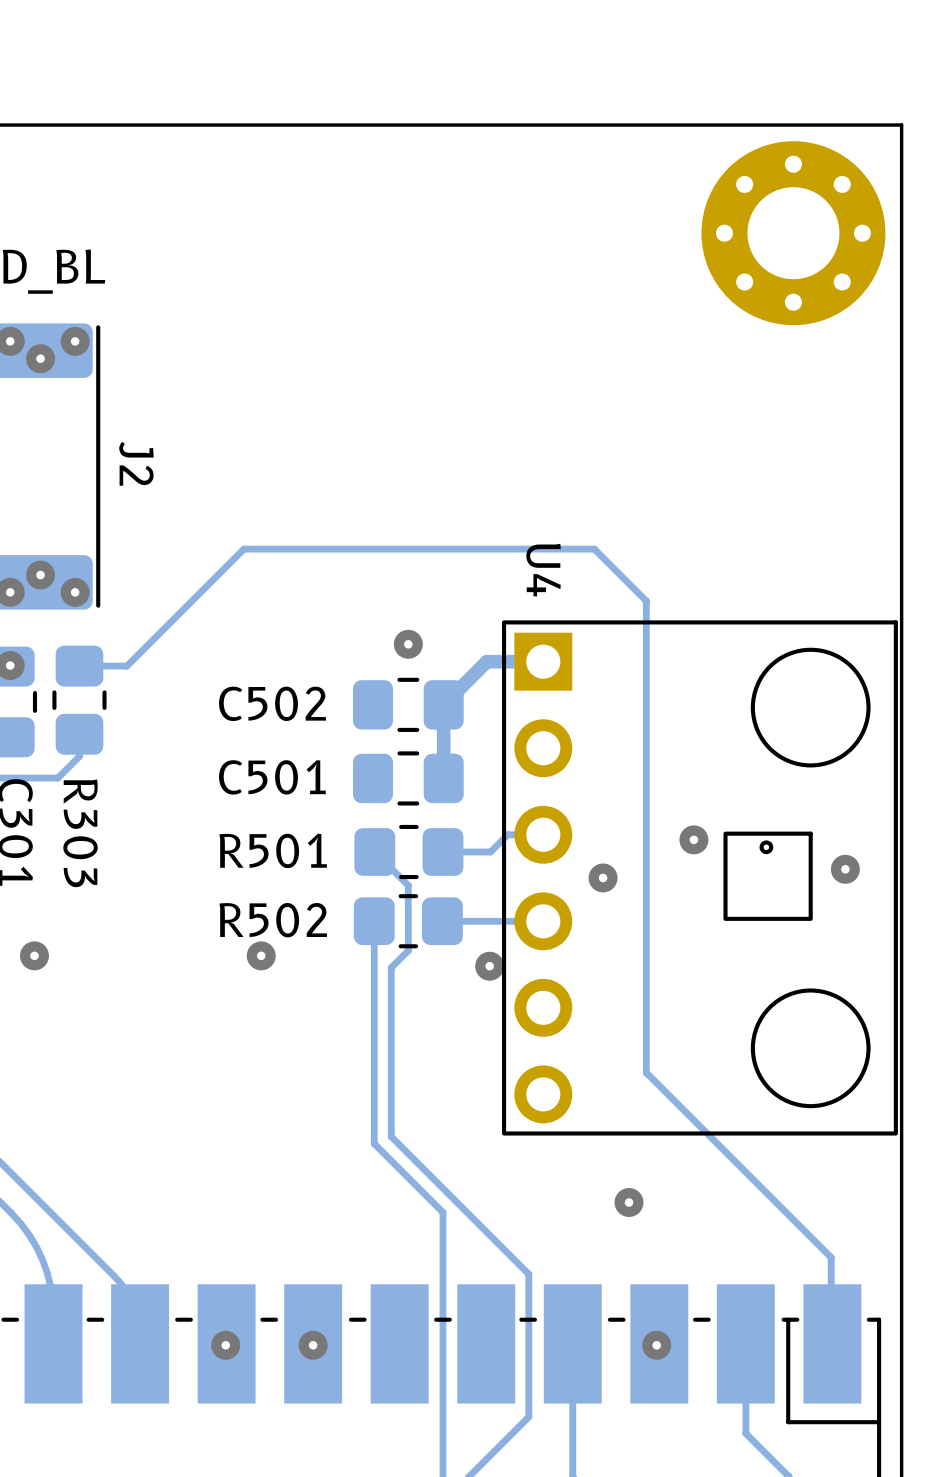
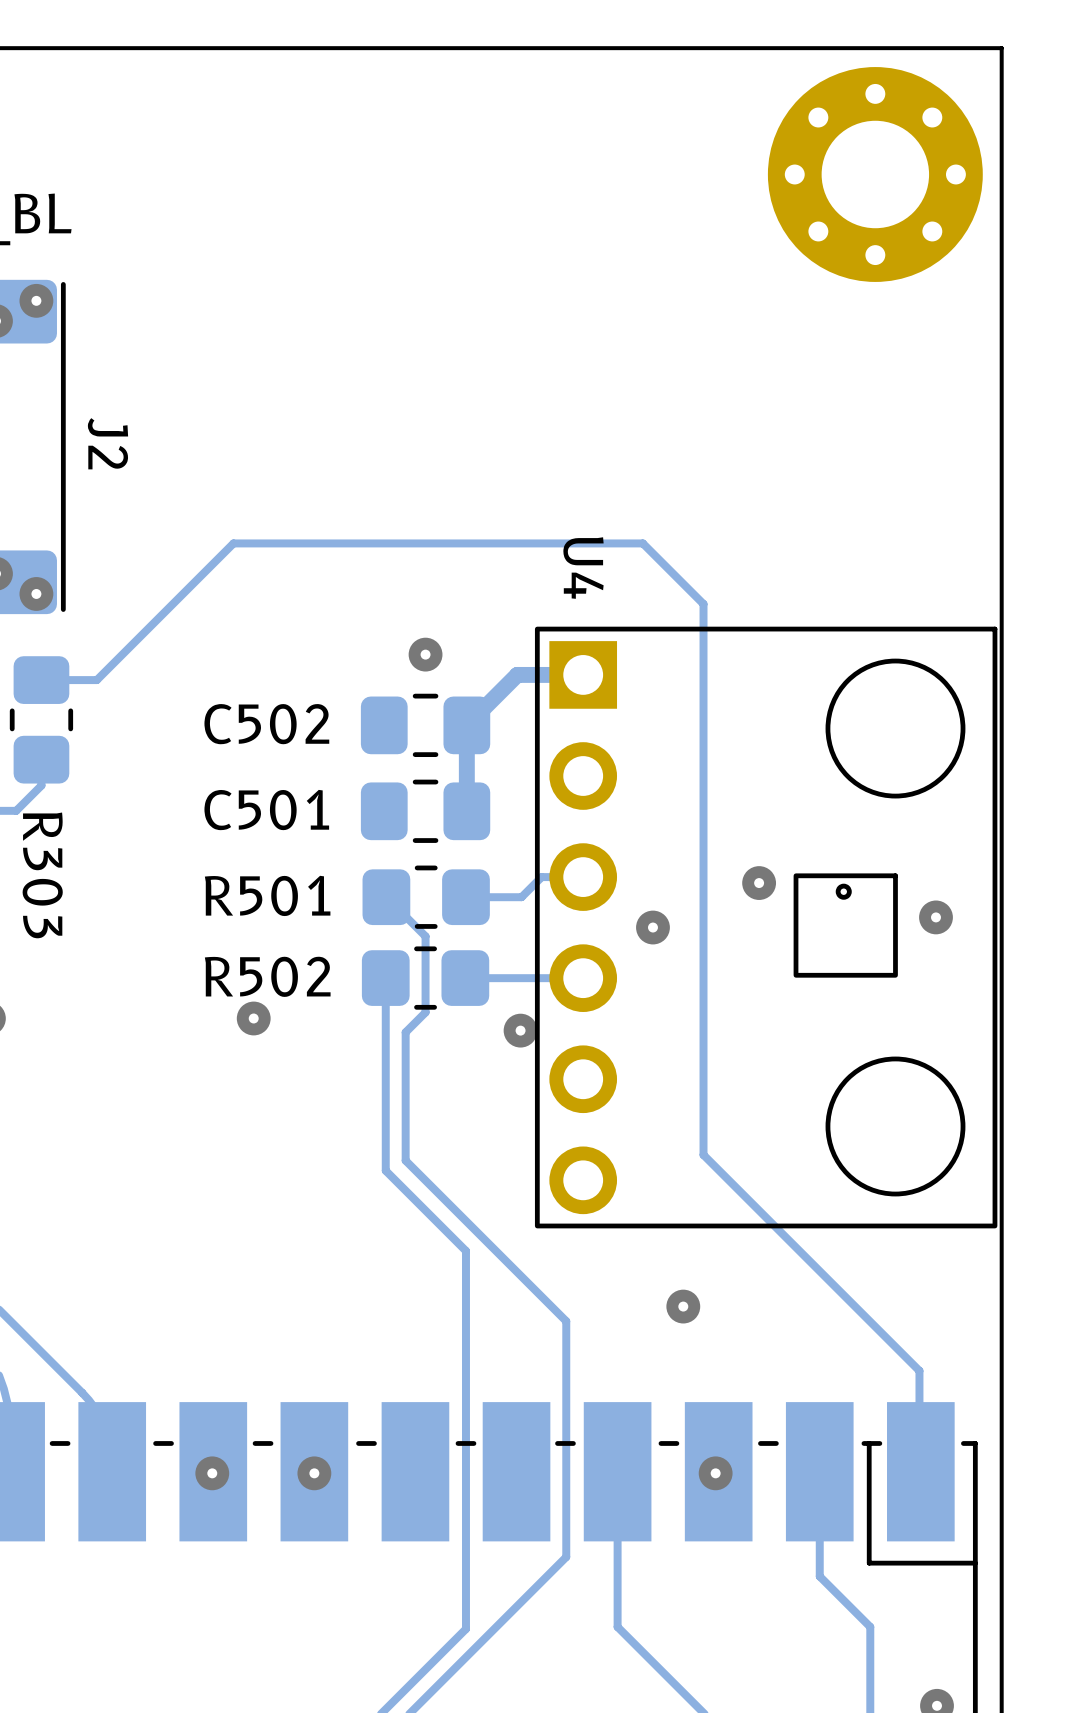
track: (391, 1077) (391, 1136) (528, 1274) -> (405, 1160) (566, 1321) (566, 1390)
track: (374, 1086) (374, 1143) (442, 1212) -> (385, 1170) (465, 1250) (465, 1318)

